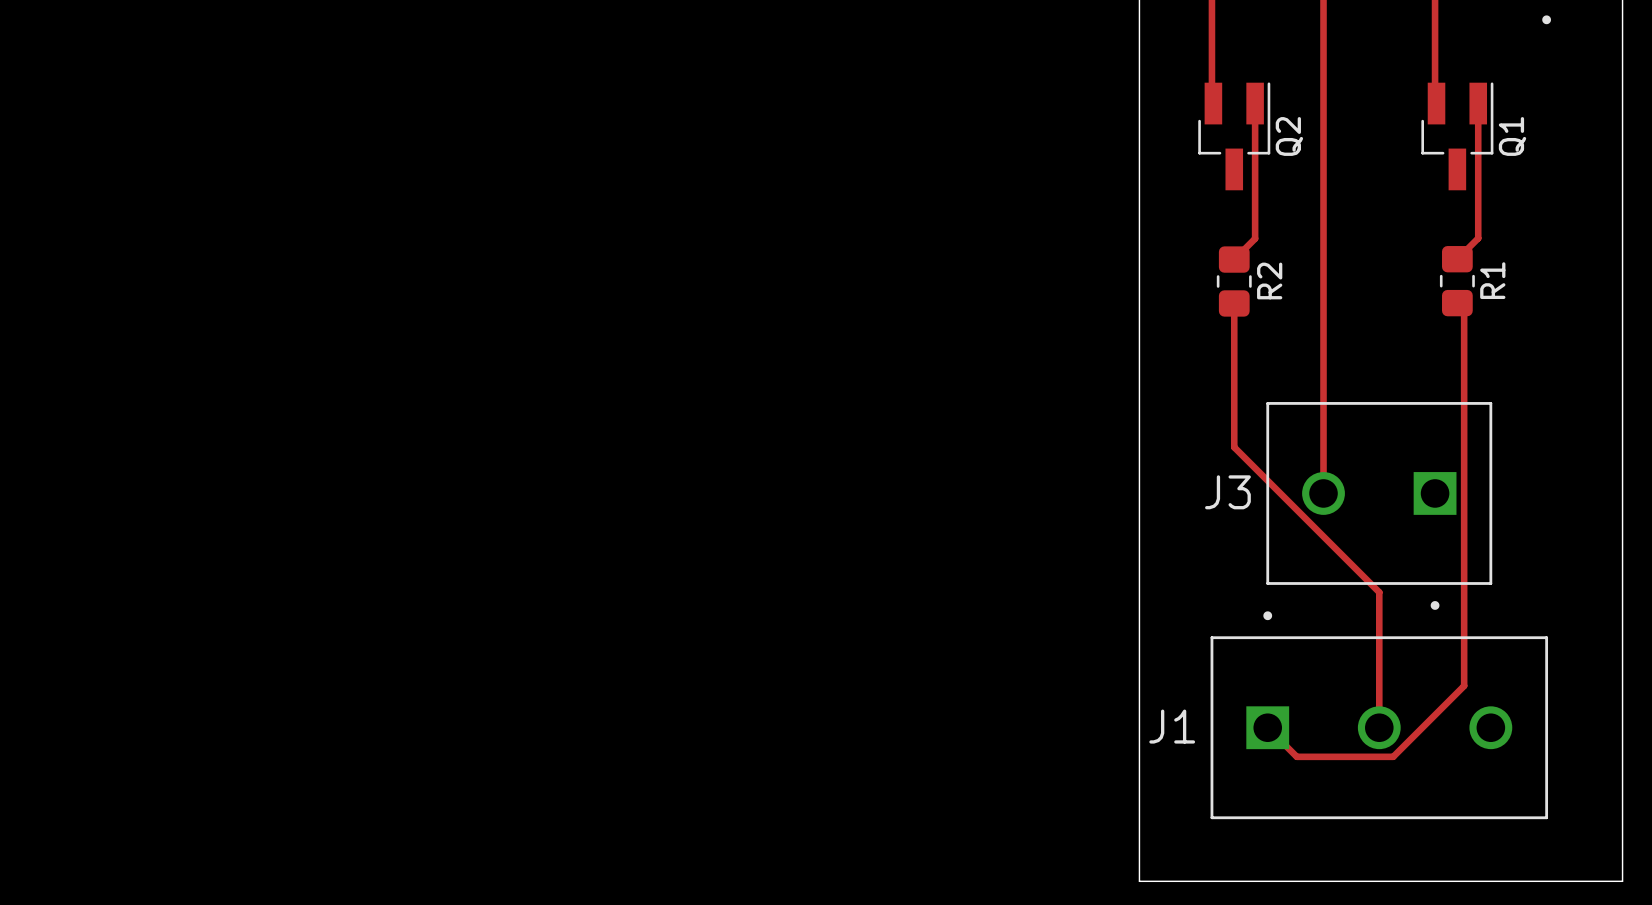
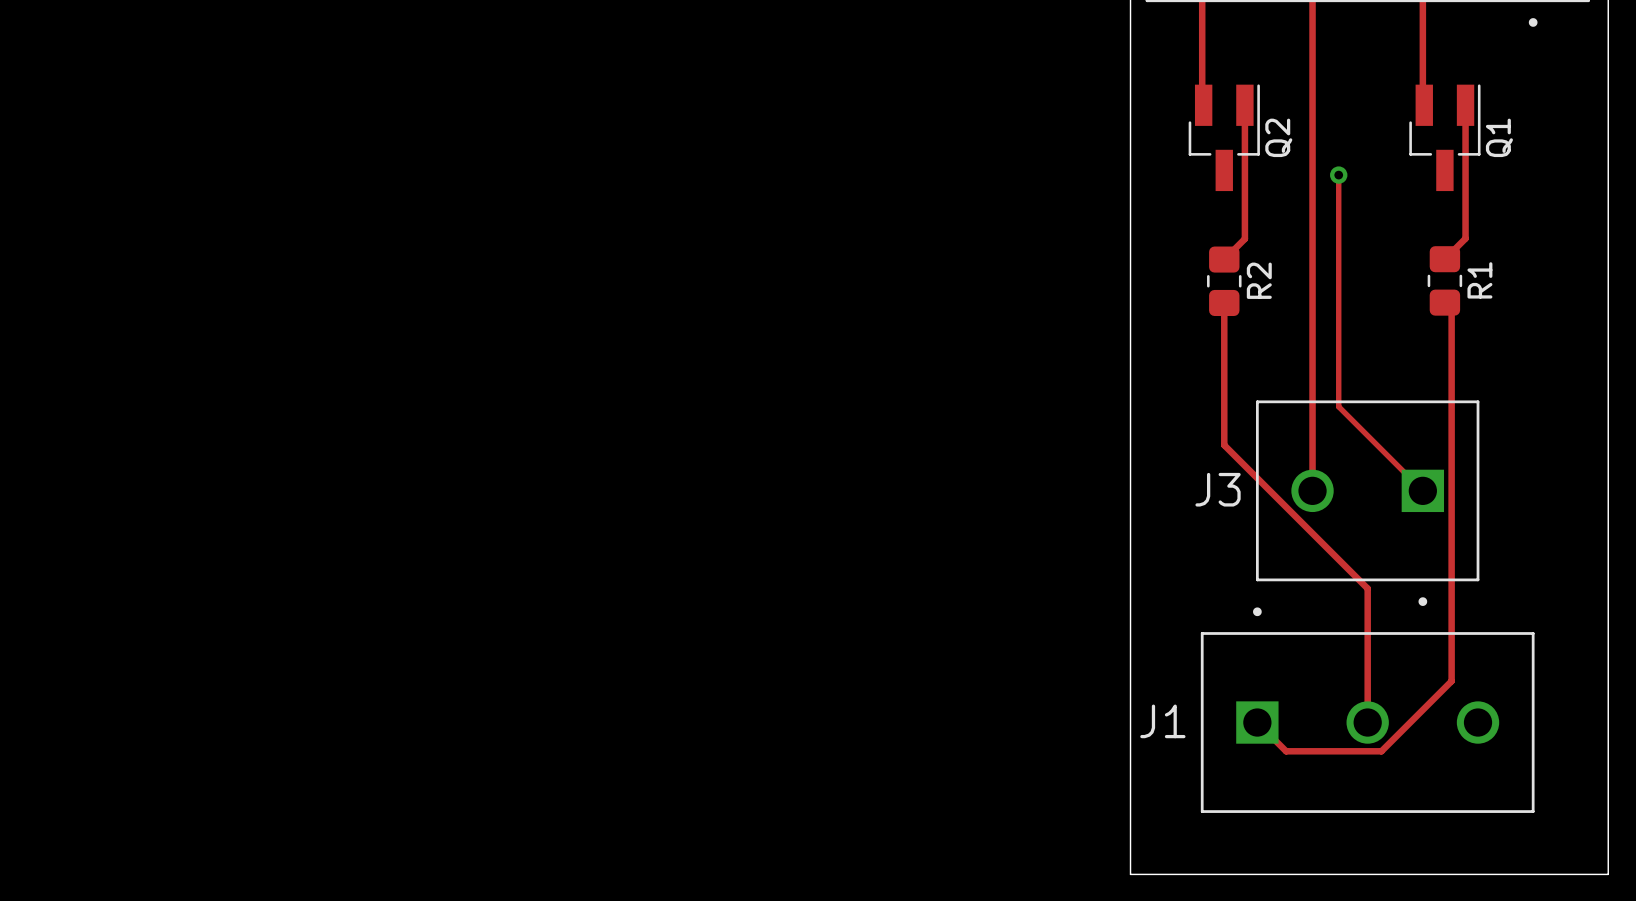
track: none -> (1338, 175) (1338, 406) (1422, 490)
via: none -> (1338, 175)

